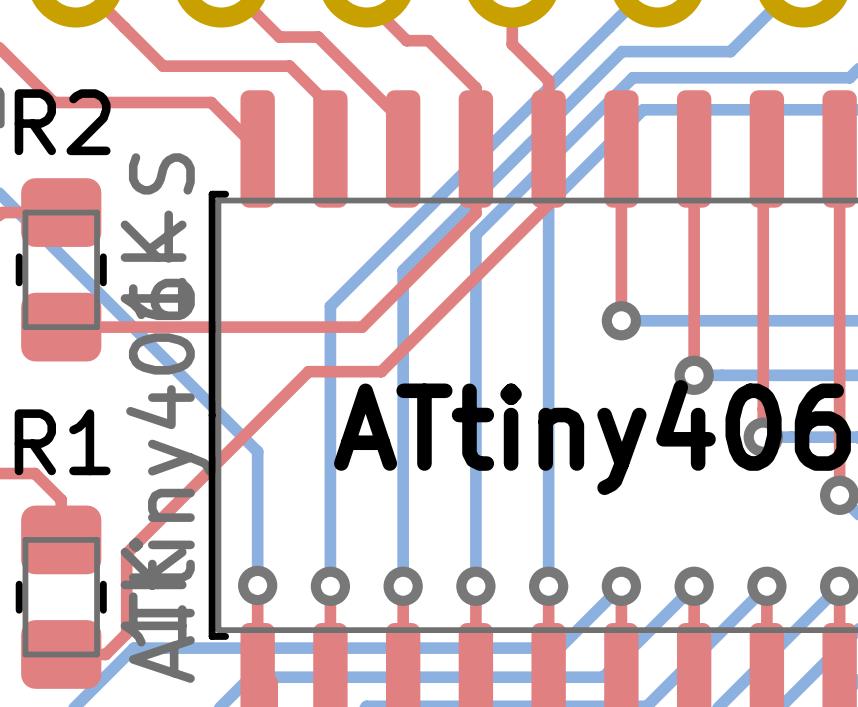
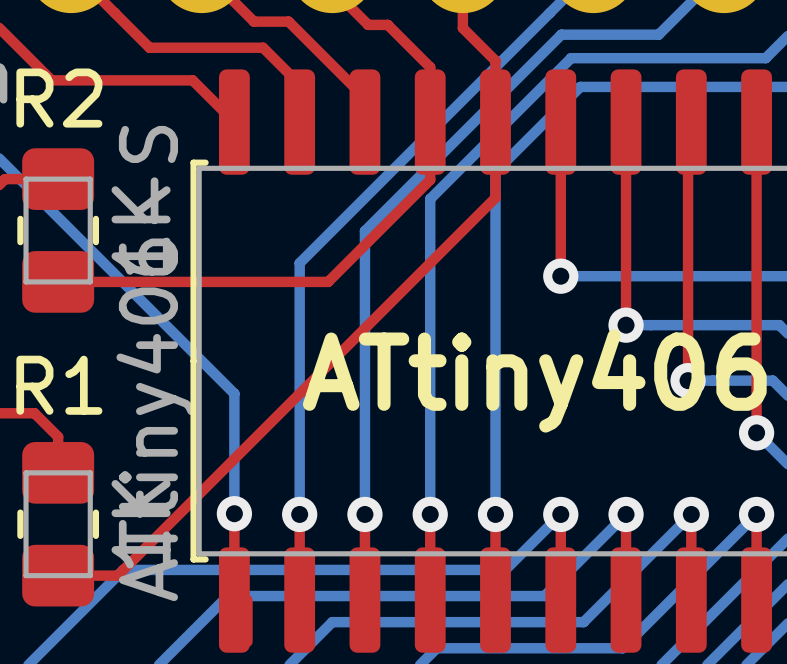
top track: (548, 204) (381, 371) (308, 371) (126, 553) (126, 633) (105, 654) -> (495, 171) (495, 197) (117, 575) (98, 575)

